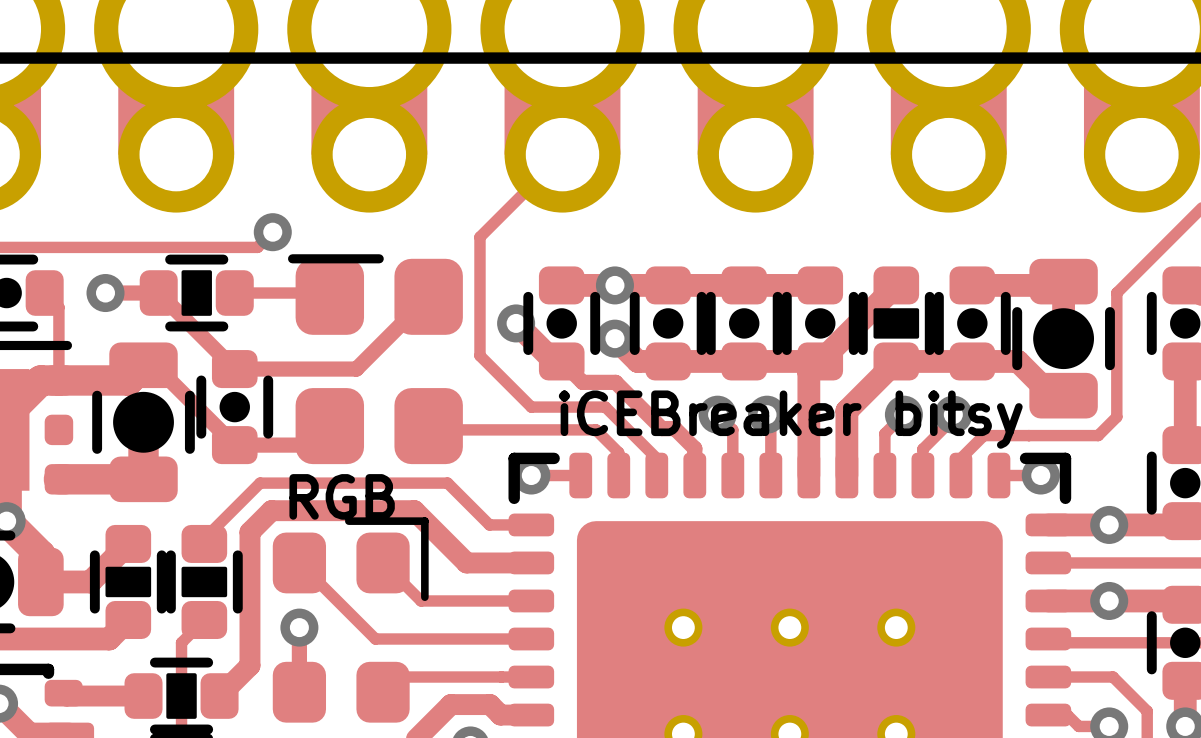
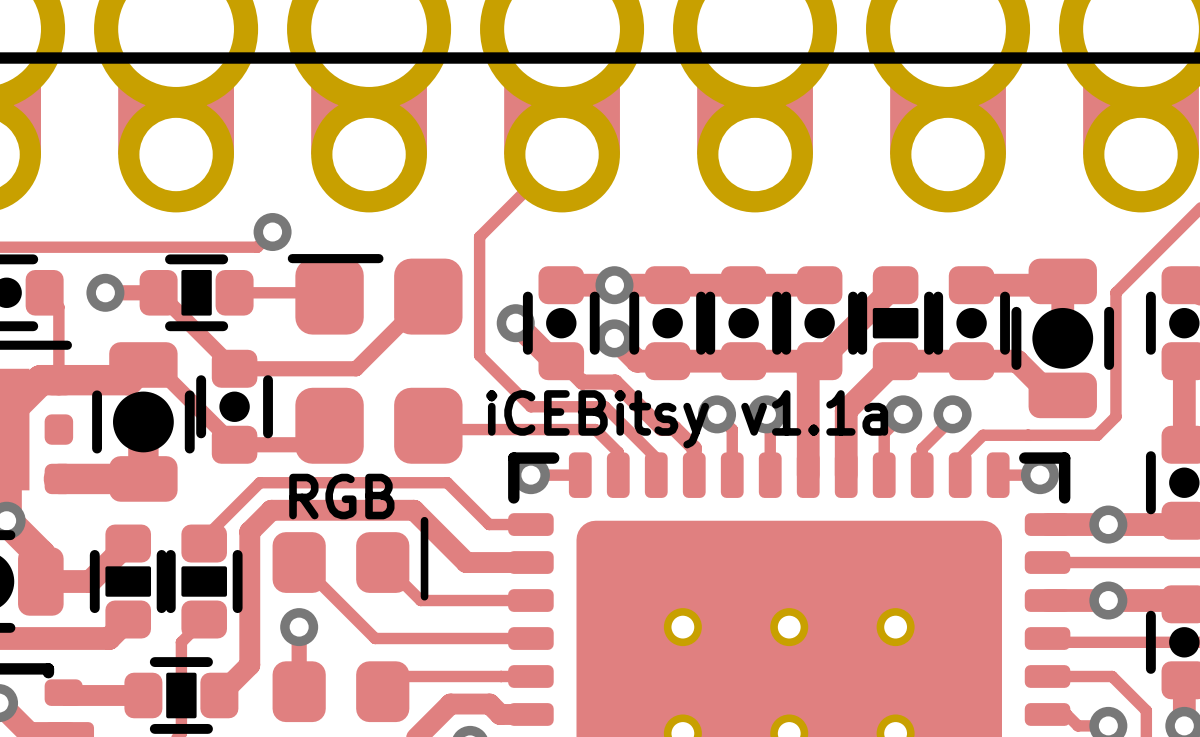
text: none -> iCEBitsy v1.1a (687, 419)
text: iCEBreaker bitsy (790, 419) -> none
part footprint: [272, 517, 429, 723] -> [272, 516, 429, 723]

